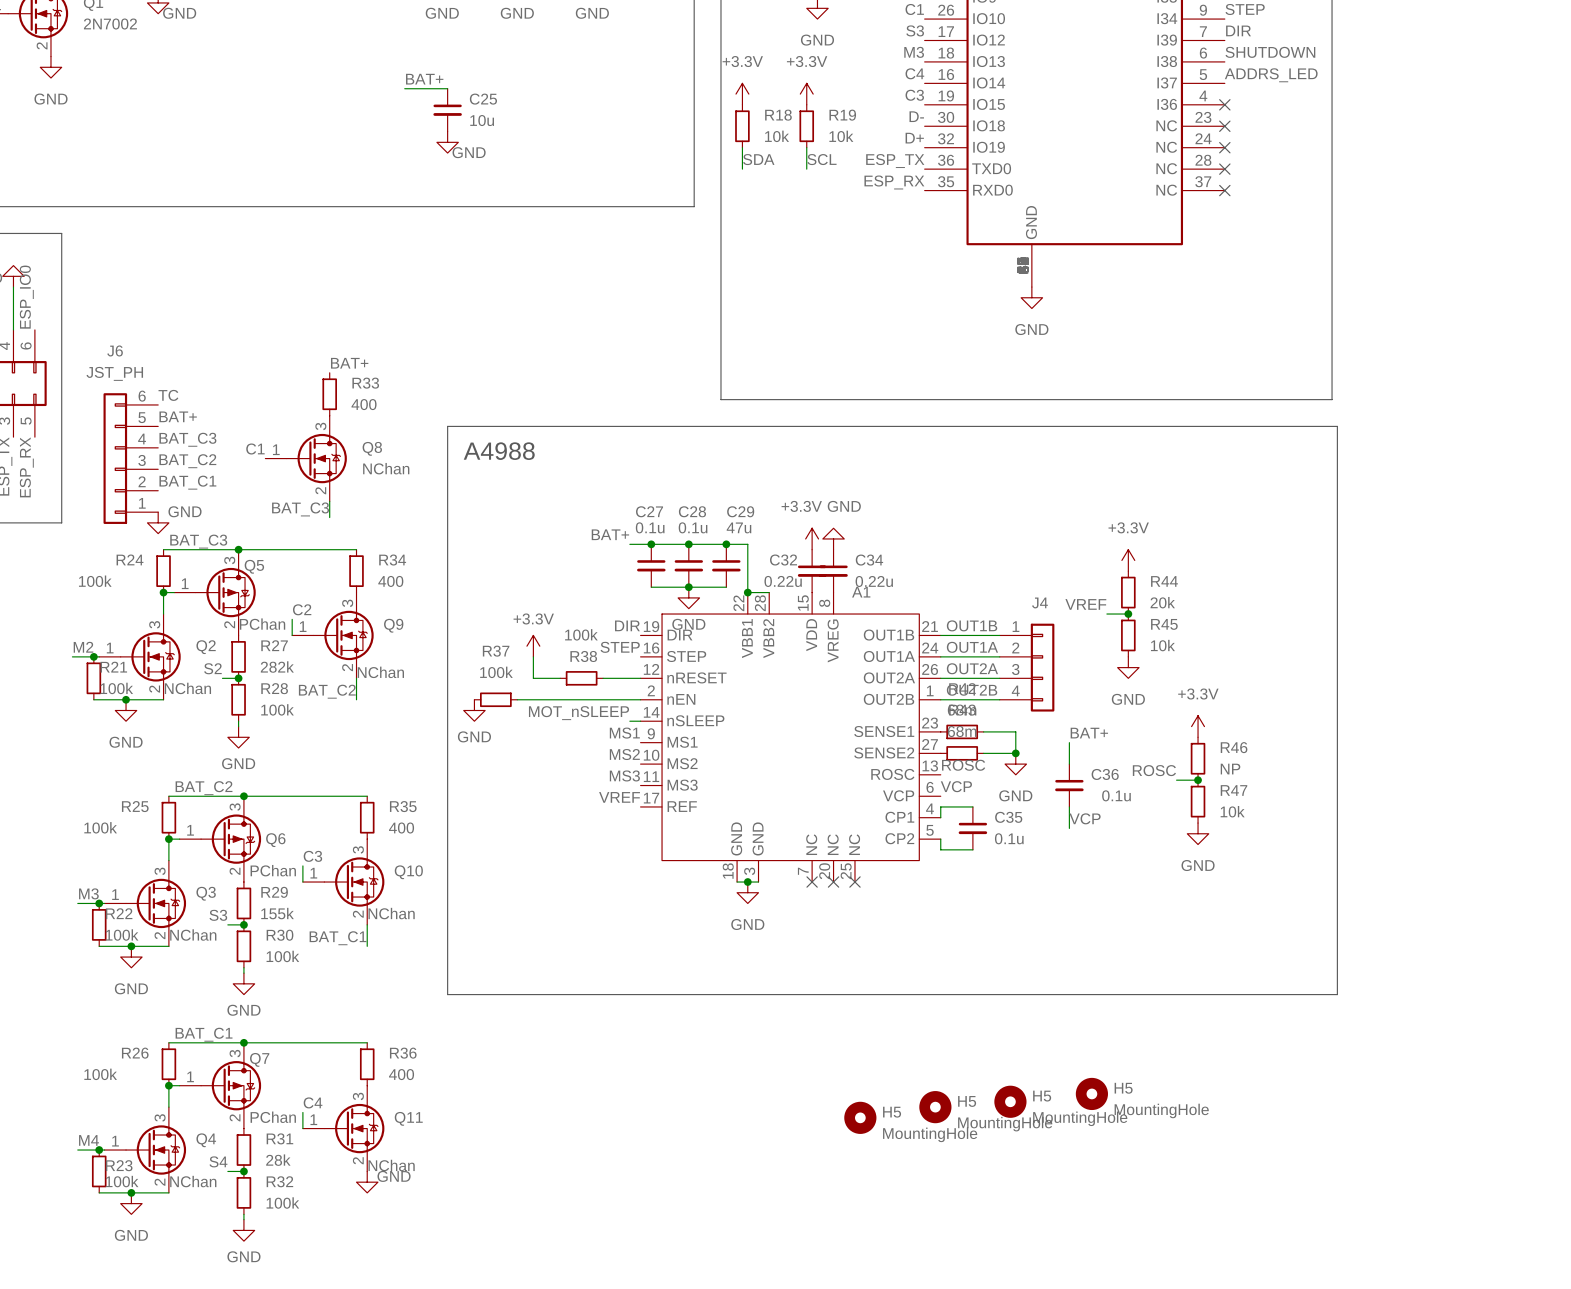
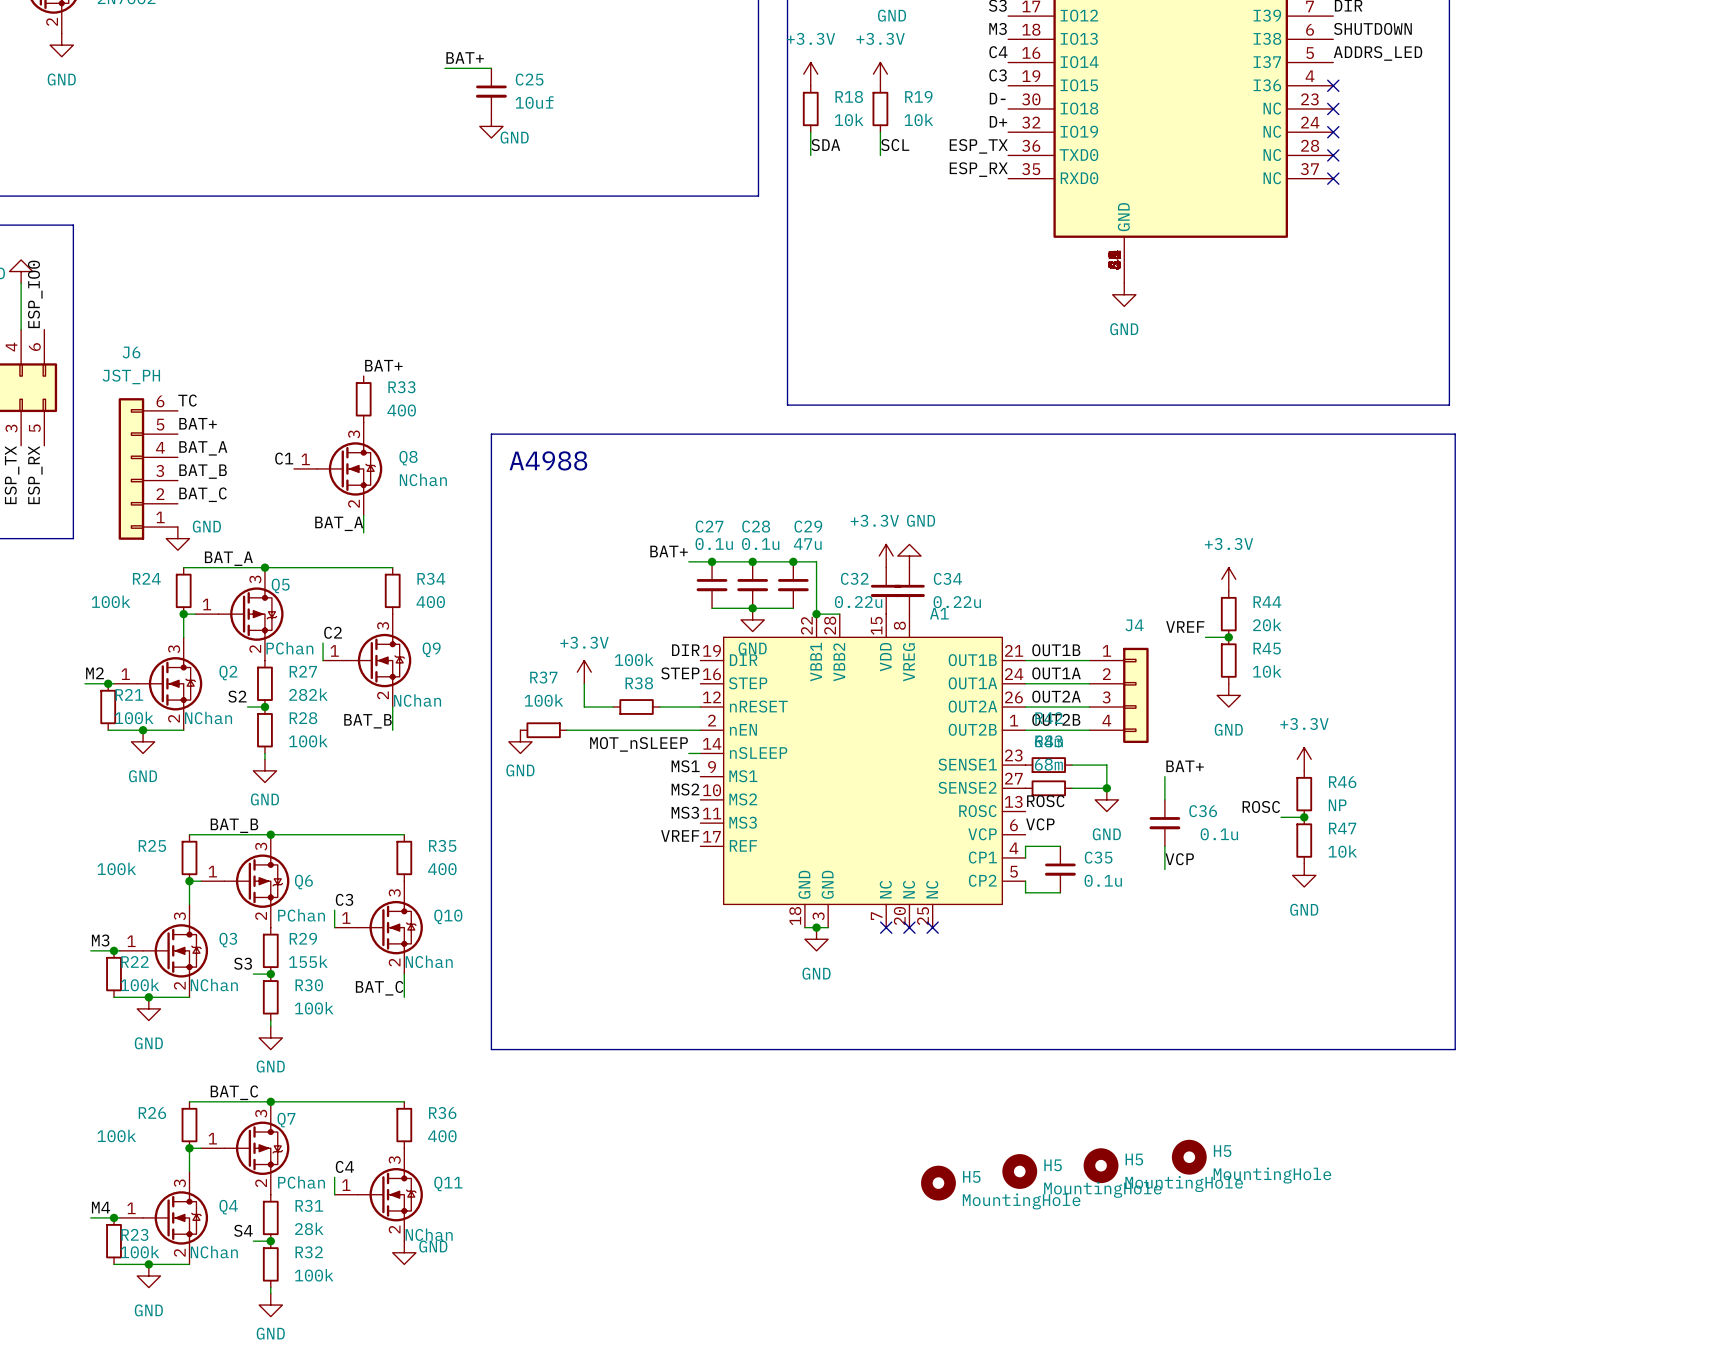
C25 value: 10u (482, 120) -> 10uf (534, 102)
label: BAT_C3 (187, 439) -> BAT_A (203, 448)
label: BAT_C2 (187, 461) -> BAT_B (203, 471)
label: BAT_C1 (187, 482) -> BAT_C (203, 494)
label: BAT_C3 (300, 509) -> BAT_A (339, 523)
label: BAT_C3 (198, 541) -> BAT_A (228, 558)
label: BAT_C2 (327, 691) -> BAT_B (368, 721)
label: BAT_C2 (204, 788) -> BAT_B (234, 825)
label: BAT_C1 (338, 938) -> BAT_C (379, 988)
label: BAT_C1 (204, 1034) -> BAT_C (234, 1092)

